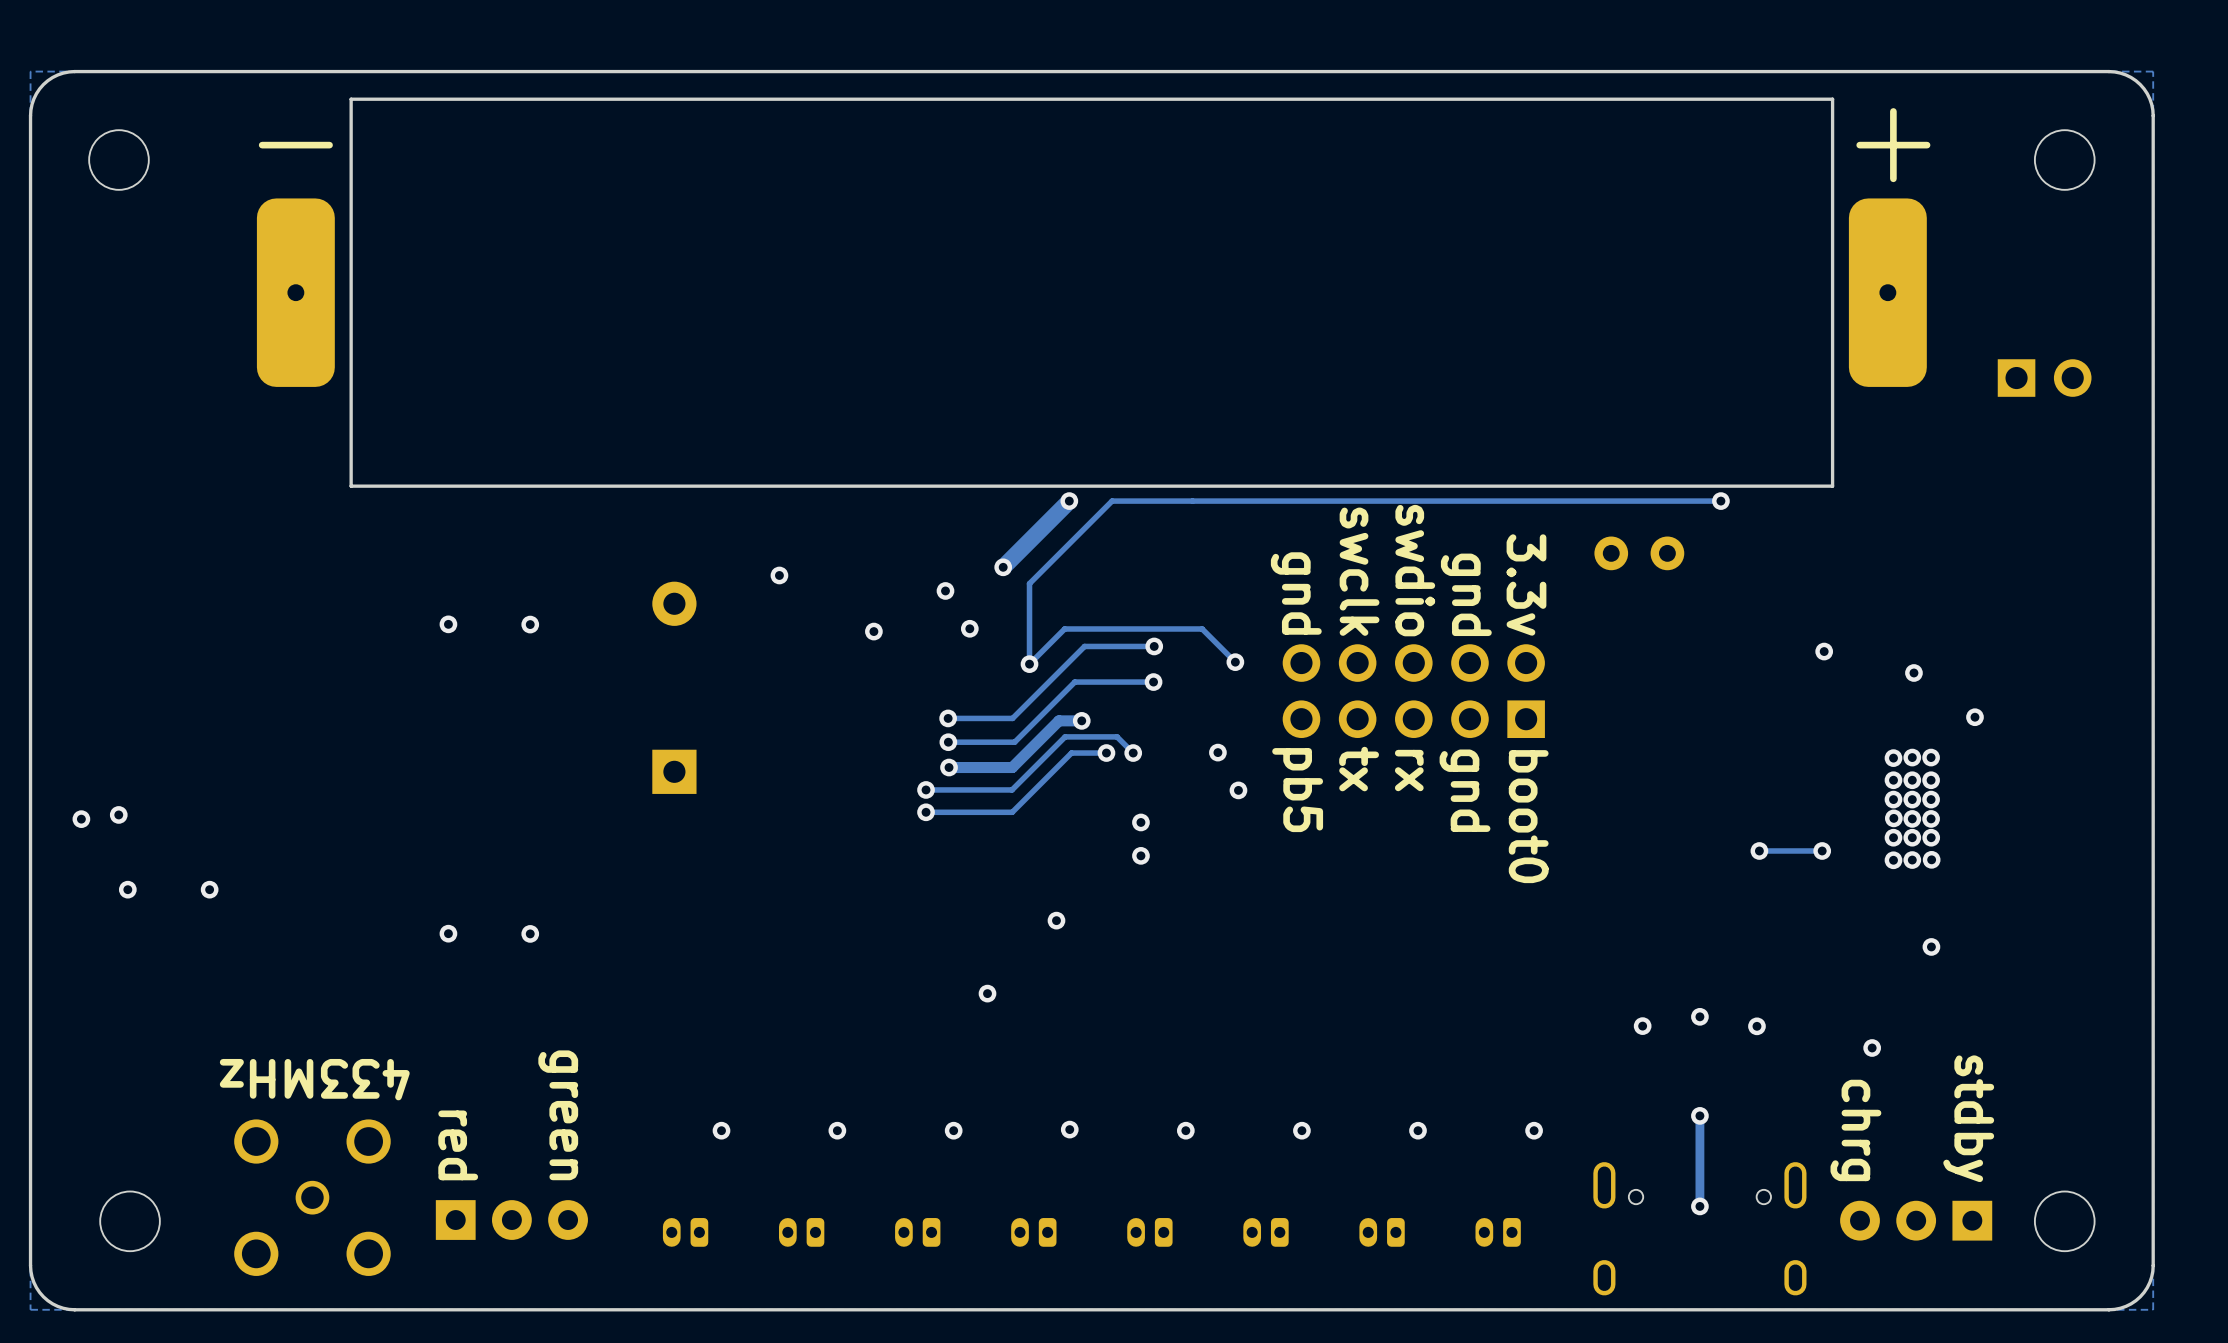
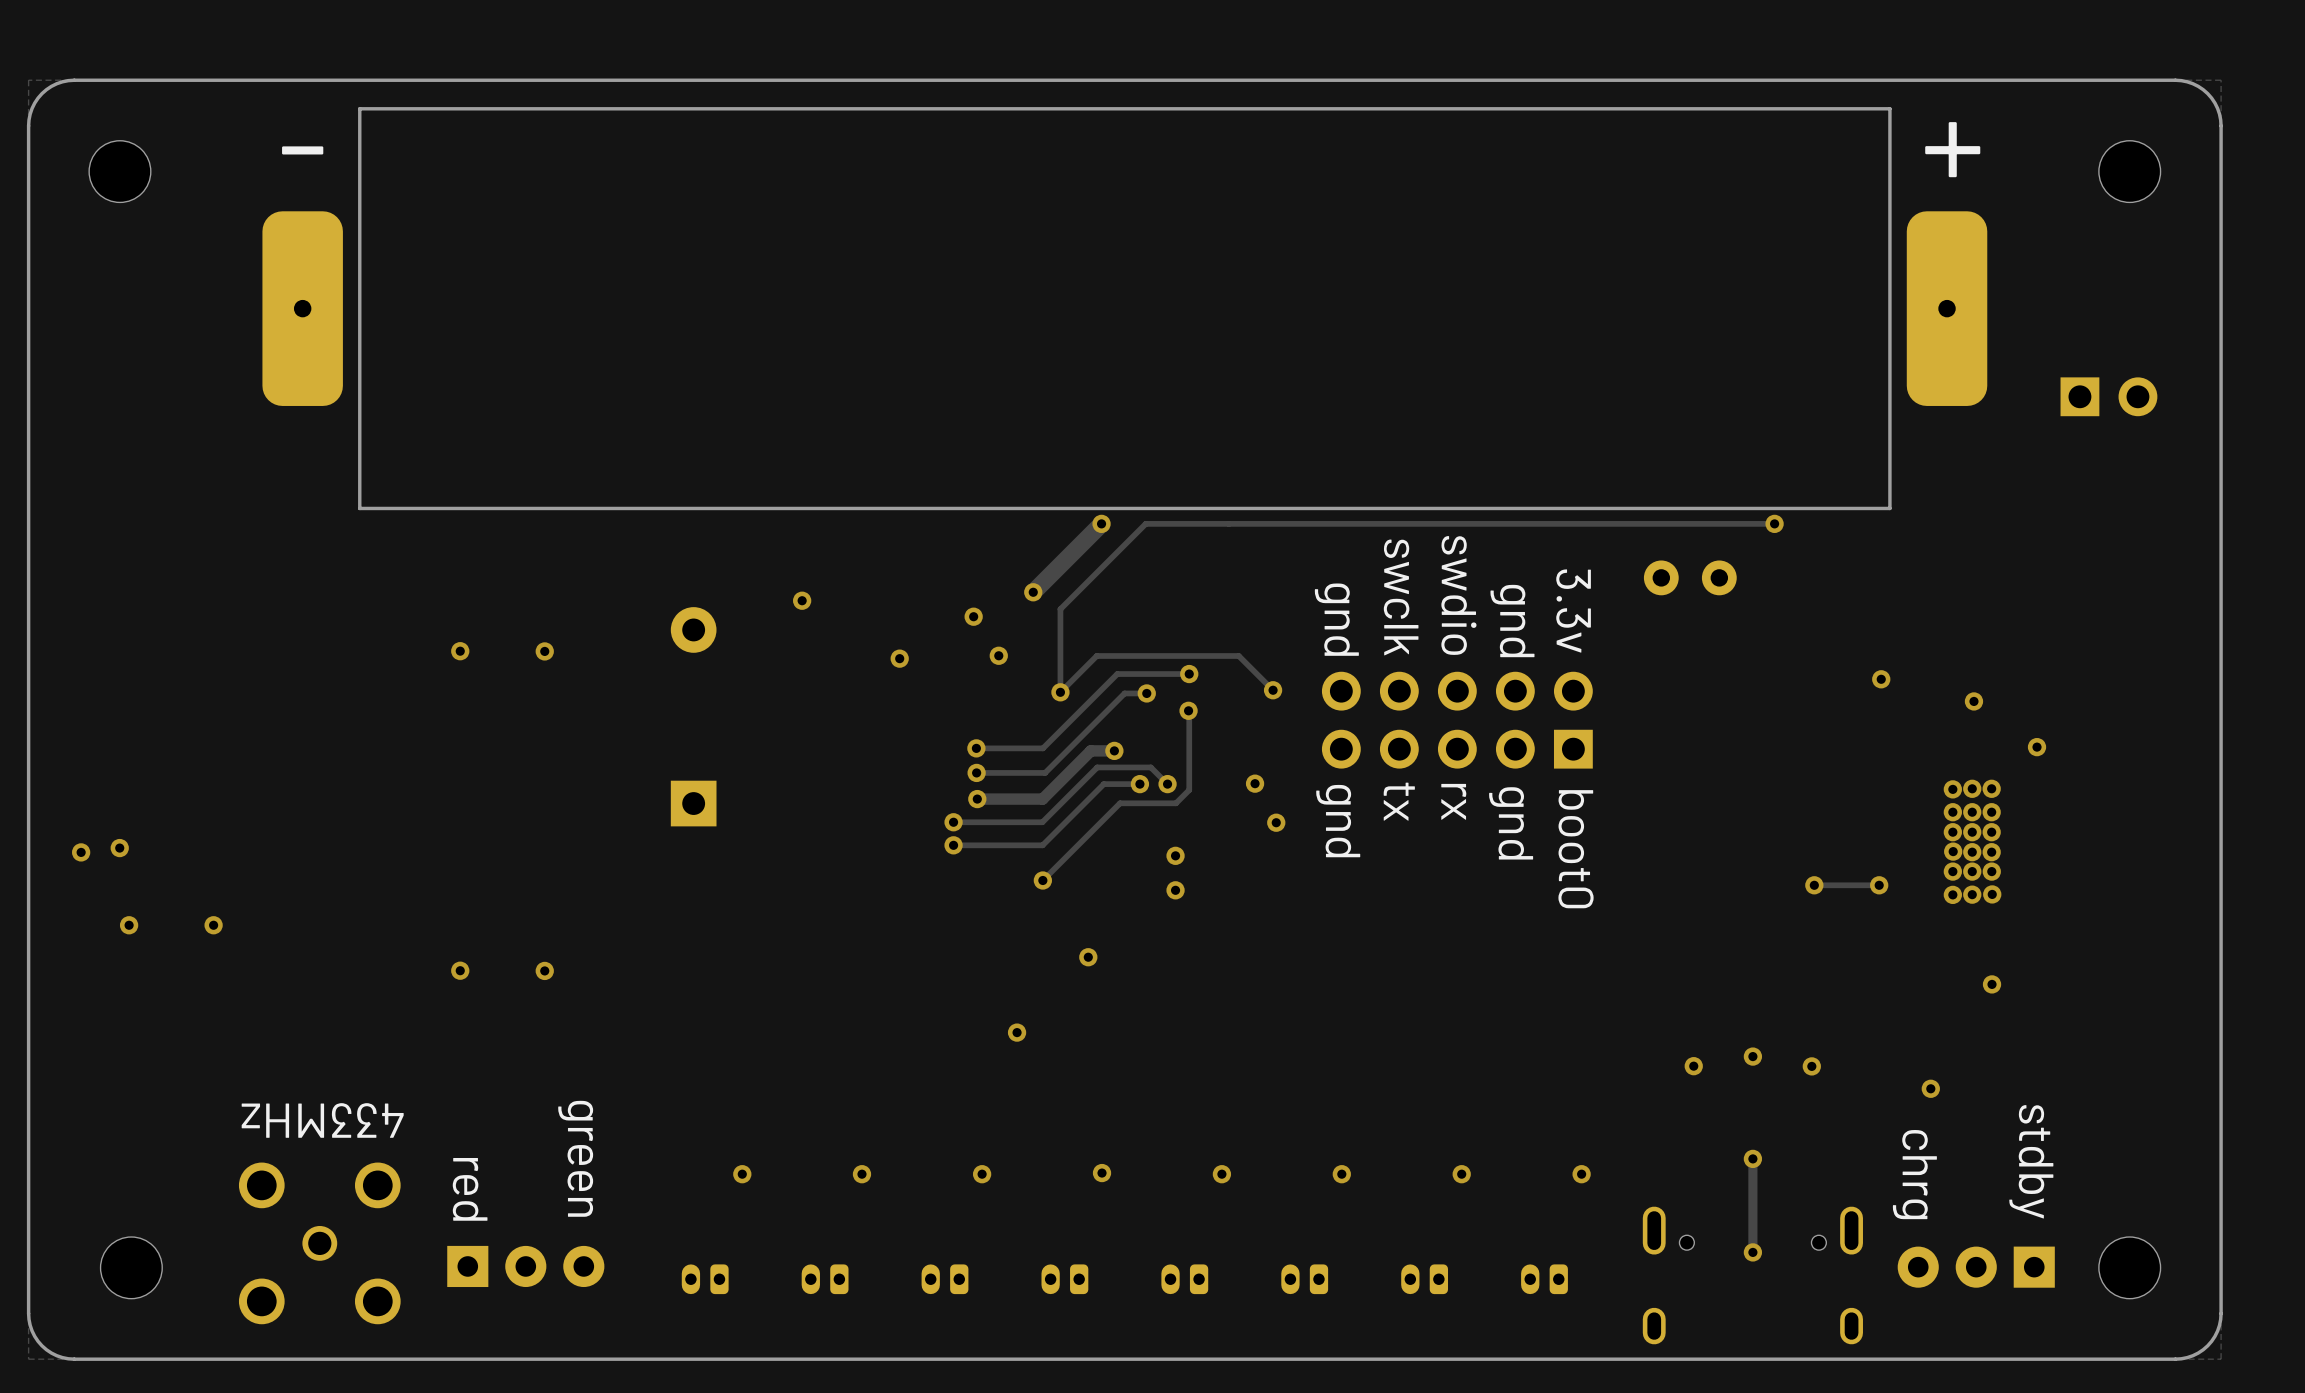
via: none -> (1146, 693)
track: none -> (1189, 710) (1189, 790) (1176, 803) (1120, 803) (1042, 880)
track: (1153, 682) (1074, 682) -> (1146, 693) (1124, 693) (1107, 710)
text: pb5 (1297, 790) -> gnd (1338, 821)
via: none -> (1042, 880)

